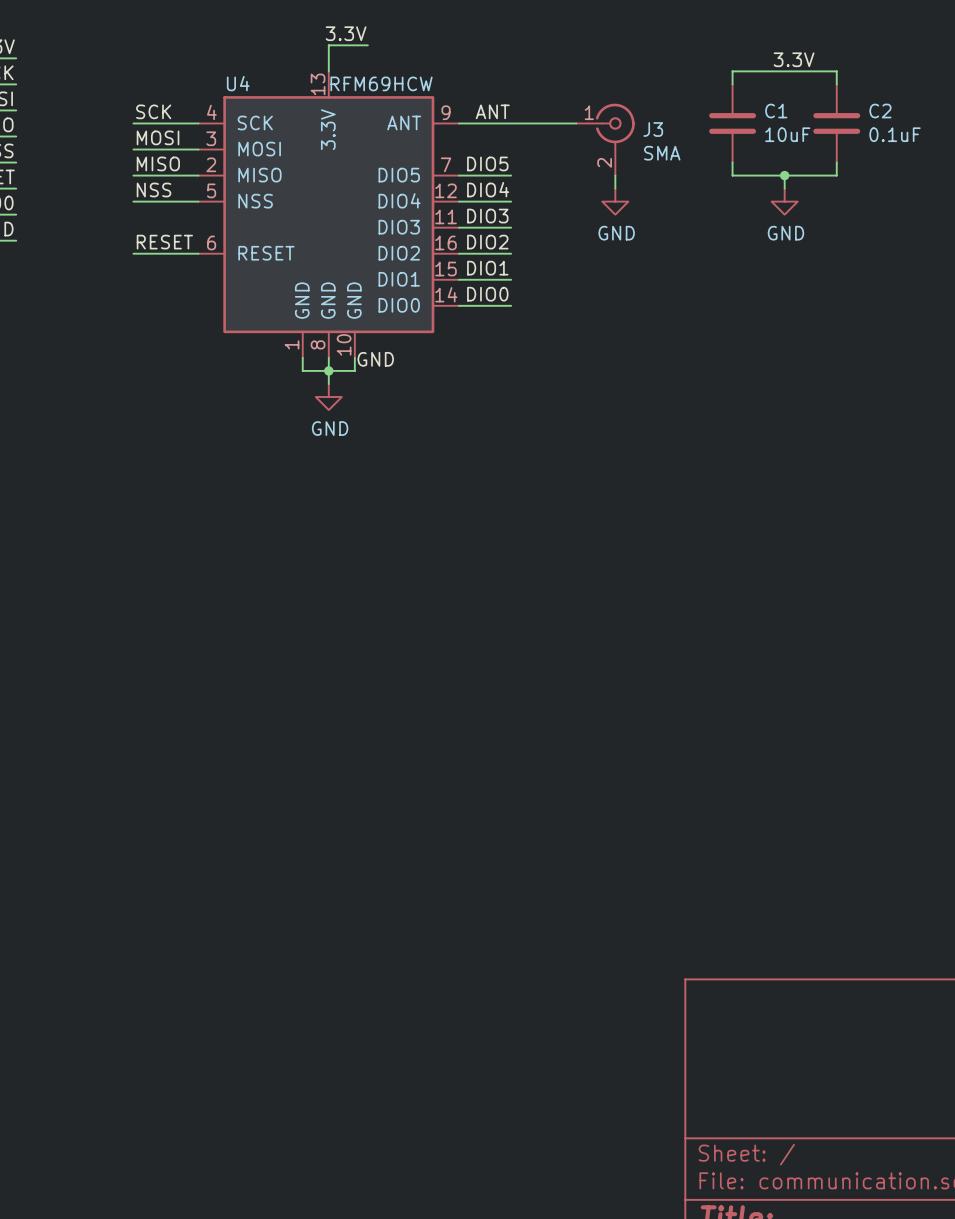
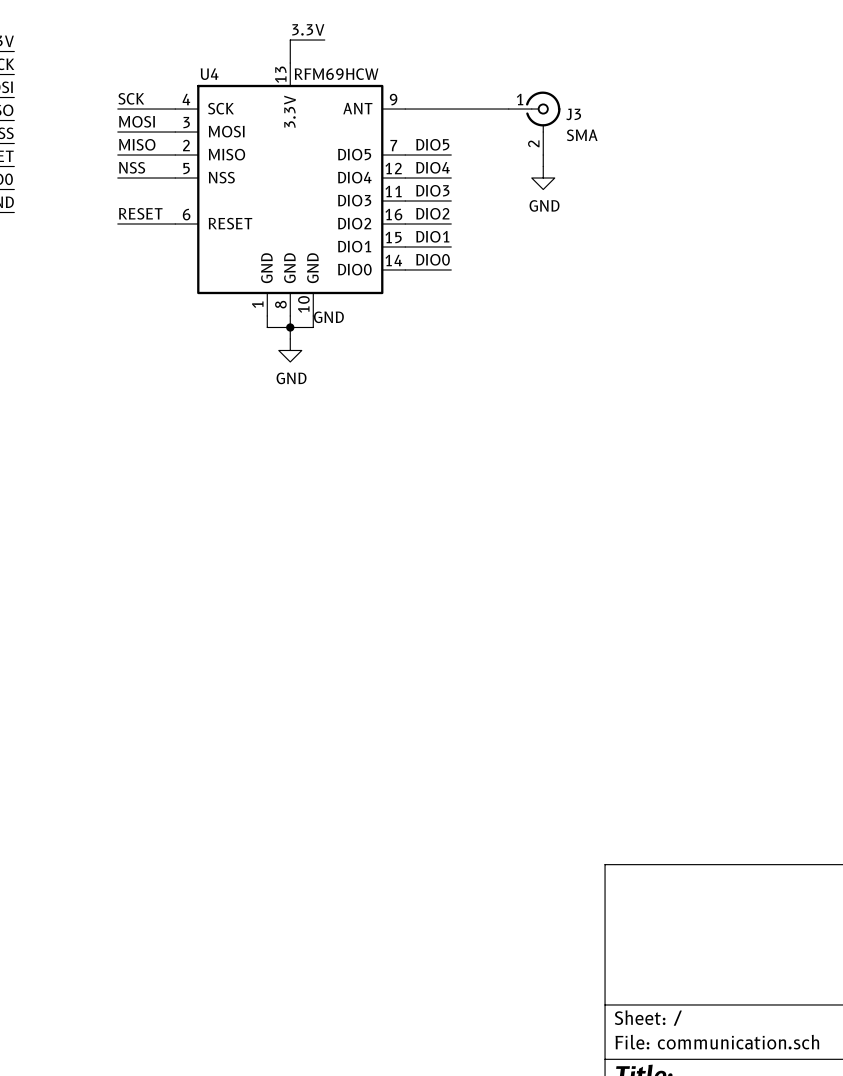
label: 3.3V (794, 59) -> none
wire: (732, 84) (732, 71) (836, 71) (836, 84) -> none
label: ANT (492, 111) -> none
C1: 10uF (732, 123) -> none
C2: 0.1uF (836, 123) -> none
wire: (732, 162) (732, 175) (836, 175) (836, 162) -> none
wire: (784, 175) (784, 188) -> none
junction: (784, 175) -> none
power symbol: GND (784, 201) -> none

